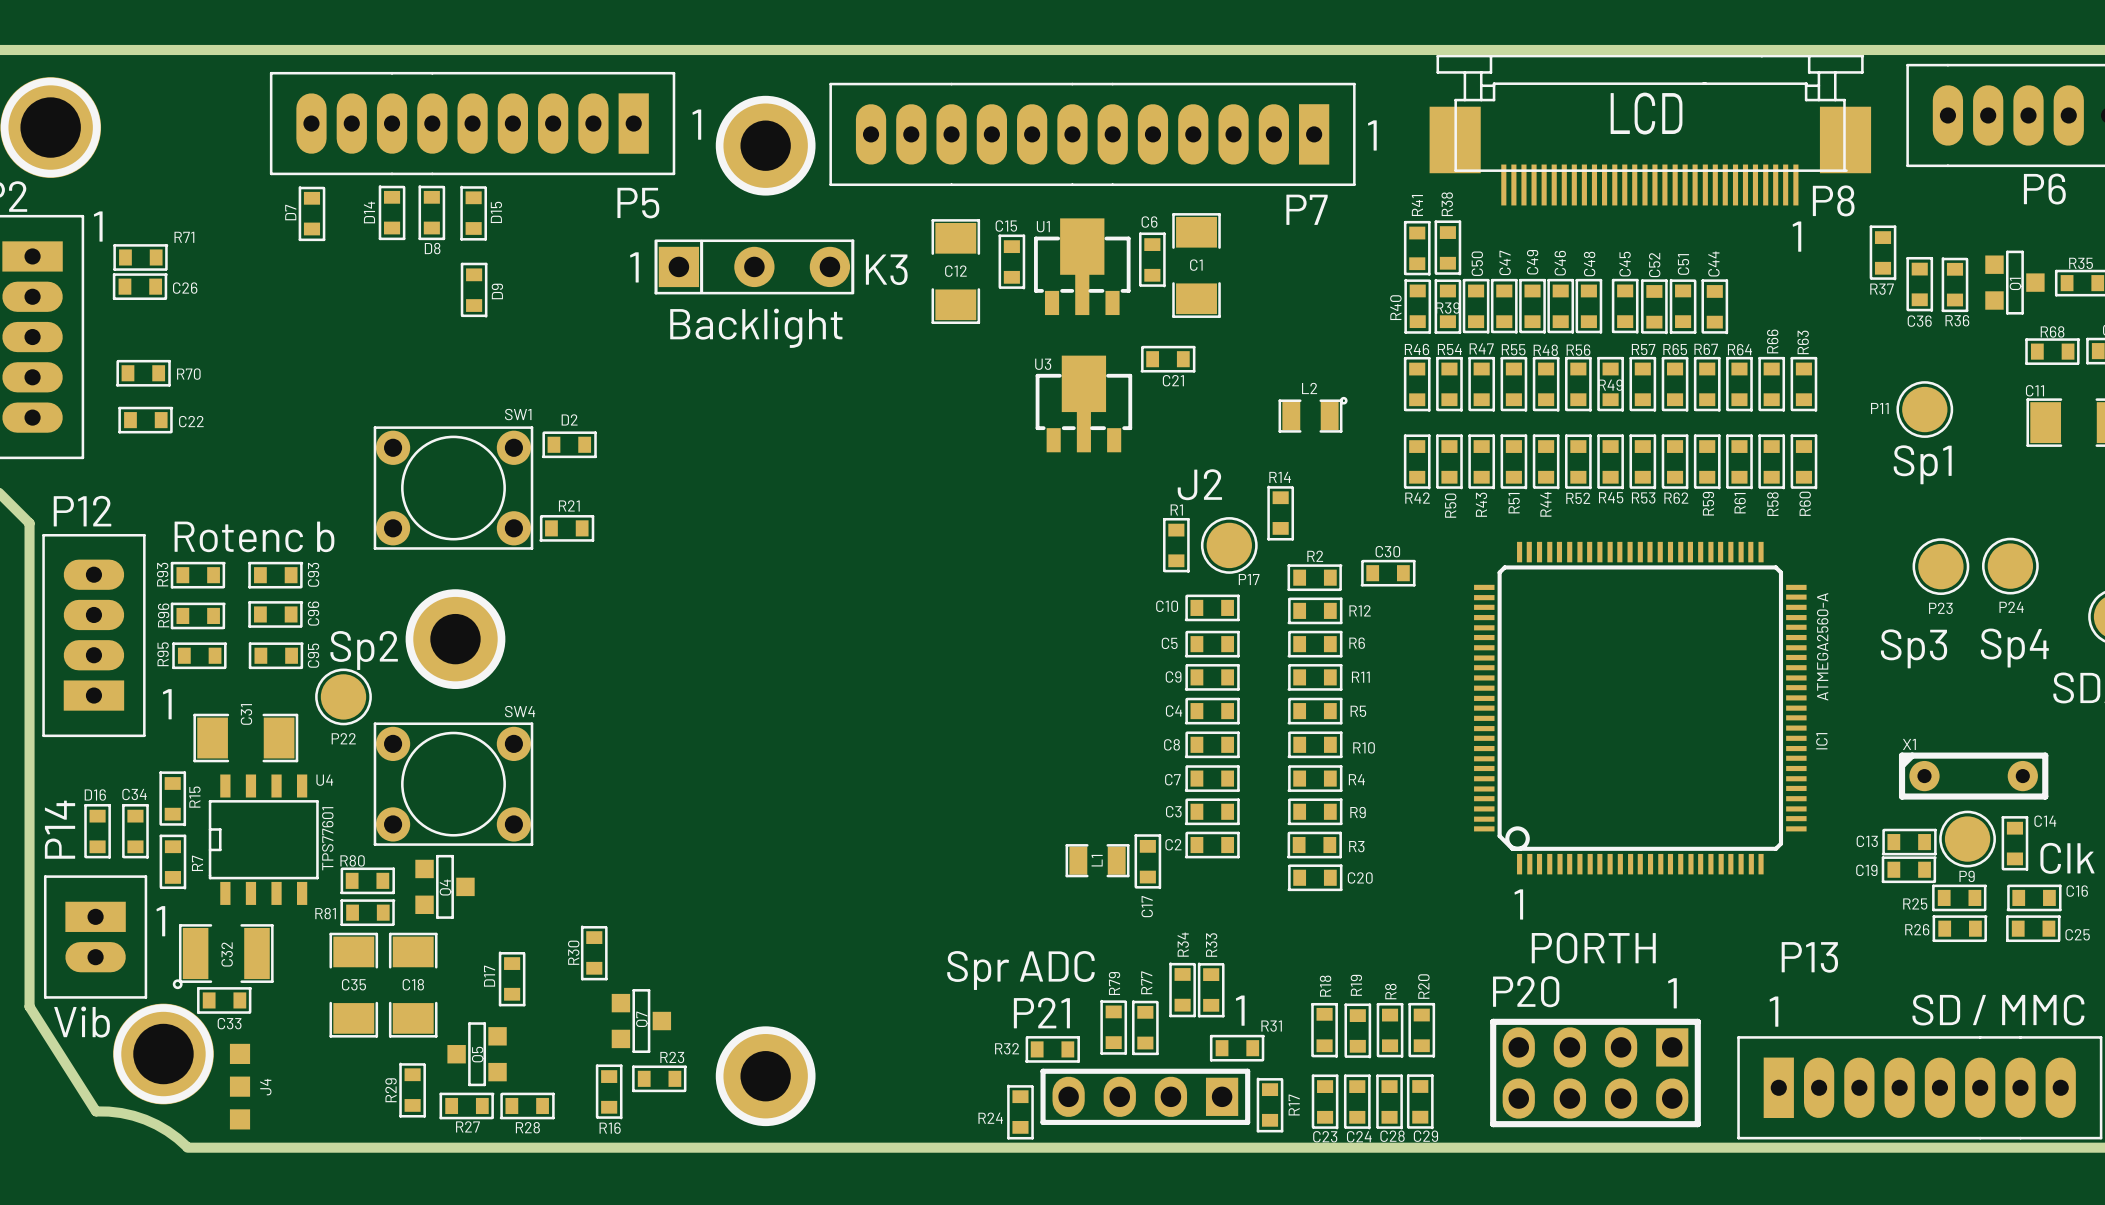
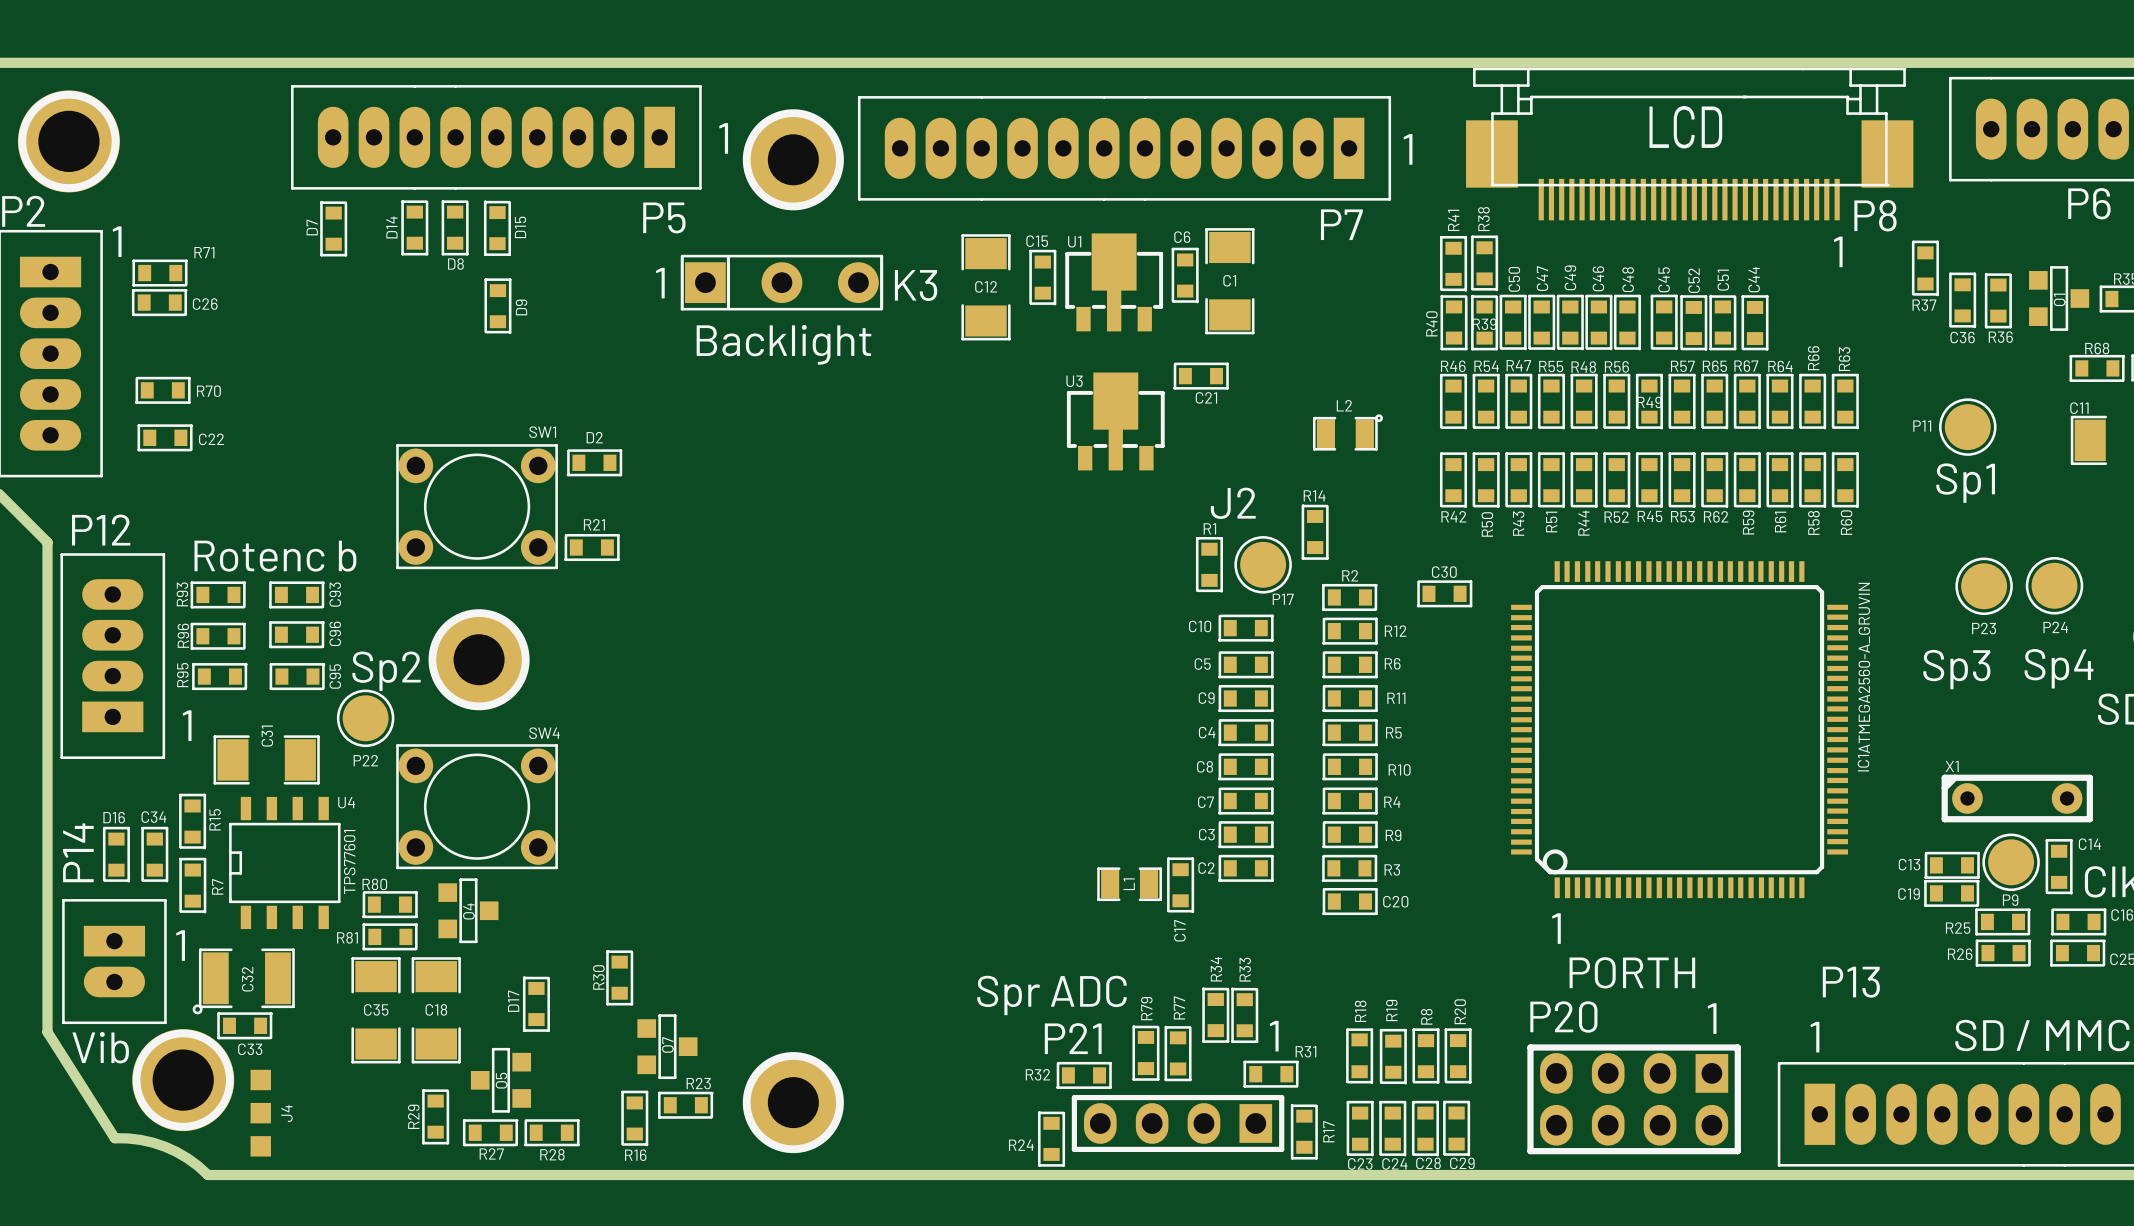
C30 position: (1388, 573) -> (1444, 593)
IC1 value: ATMEGA2560-A (1822, 646) -> ATMEGA2560-A_GRUVIN (1864, 667)

